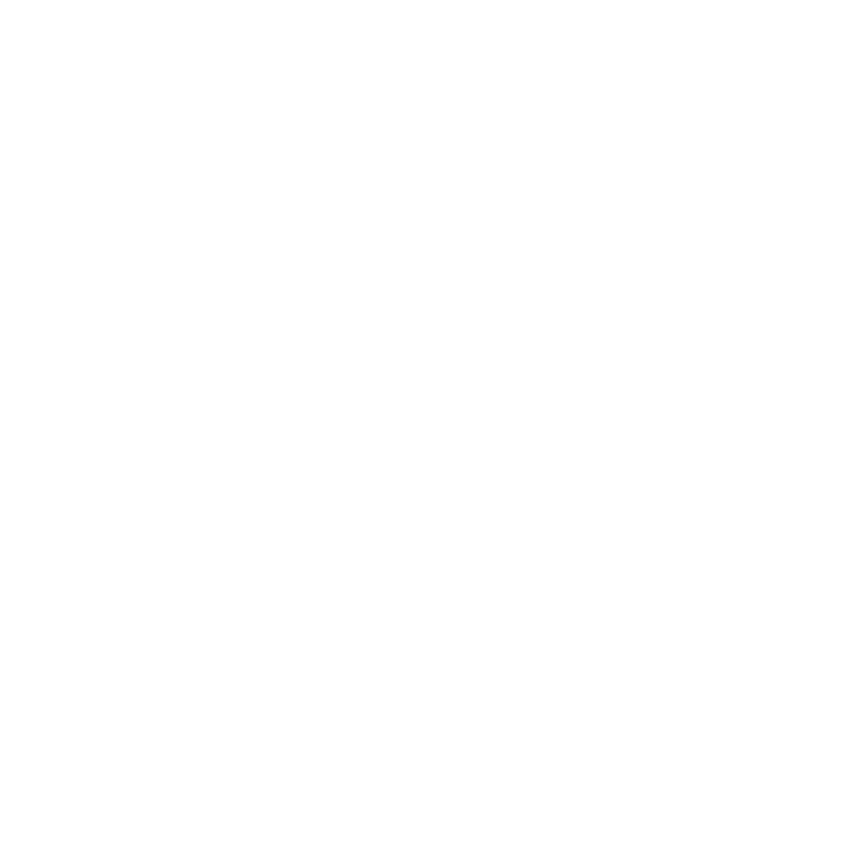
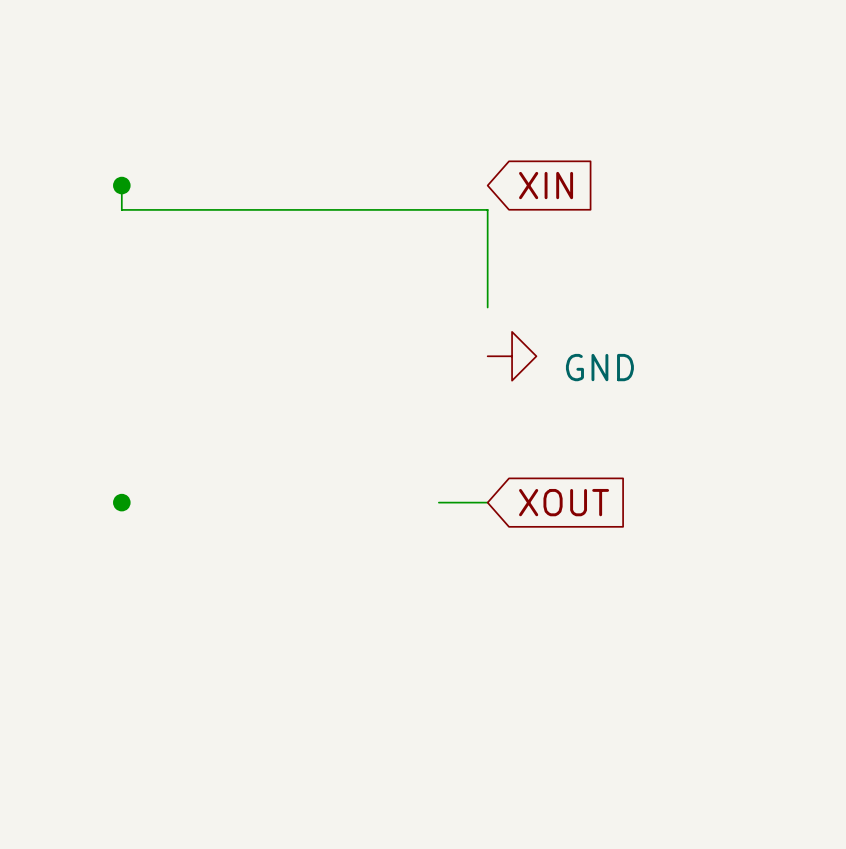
wire: none -> (121, 185) (121, 209) (487, 209) (487, 307)
junction: none -> (121, 185)
global label: none -> XIN (546, 185)
power symbol: none -> GND (512, 356)
junction: none -> (121, 502)
wire: none -> (438, 502) (487, 502)
global label: none -> XOUT (564, 502)

